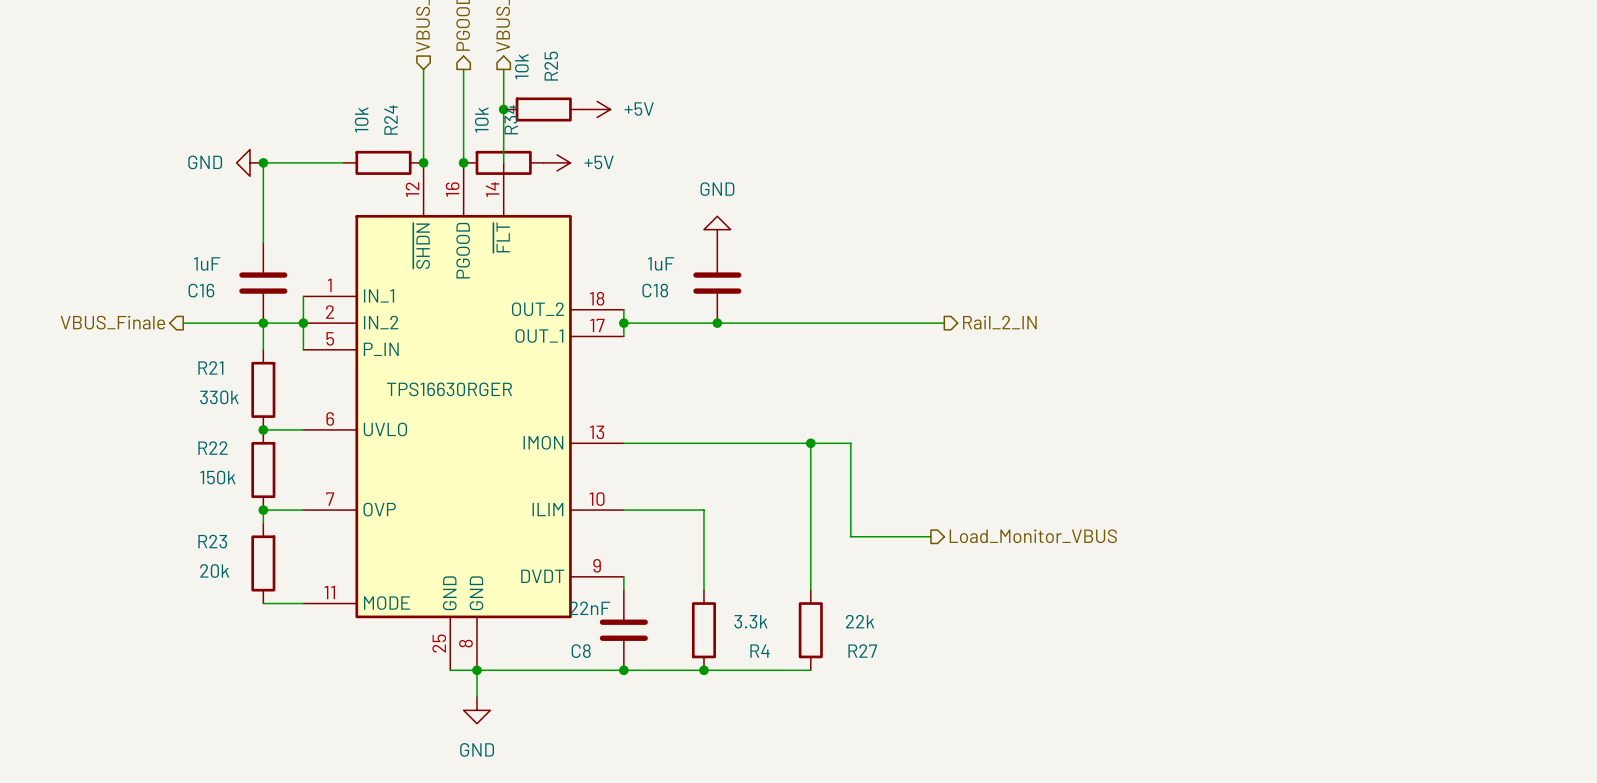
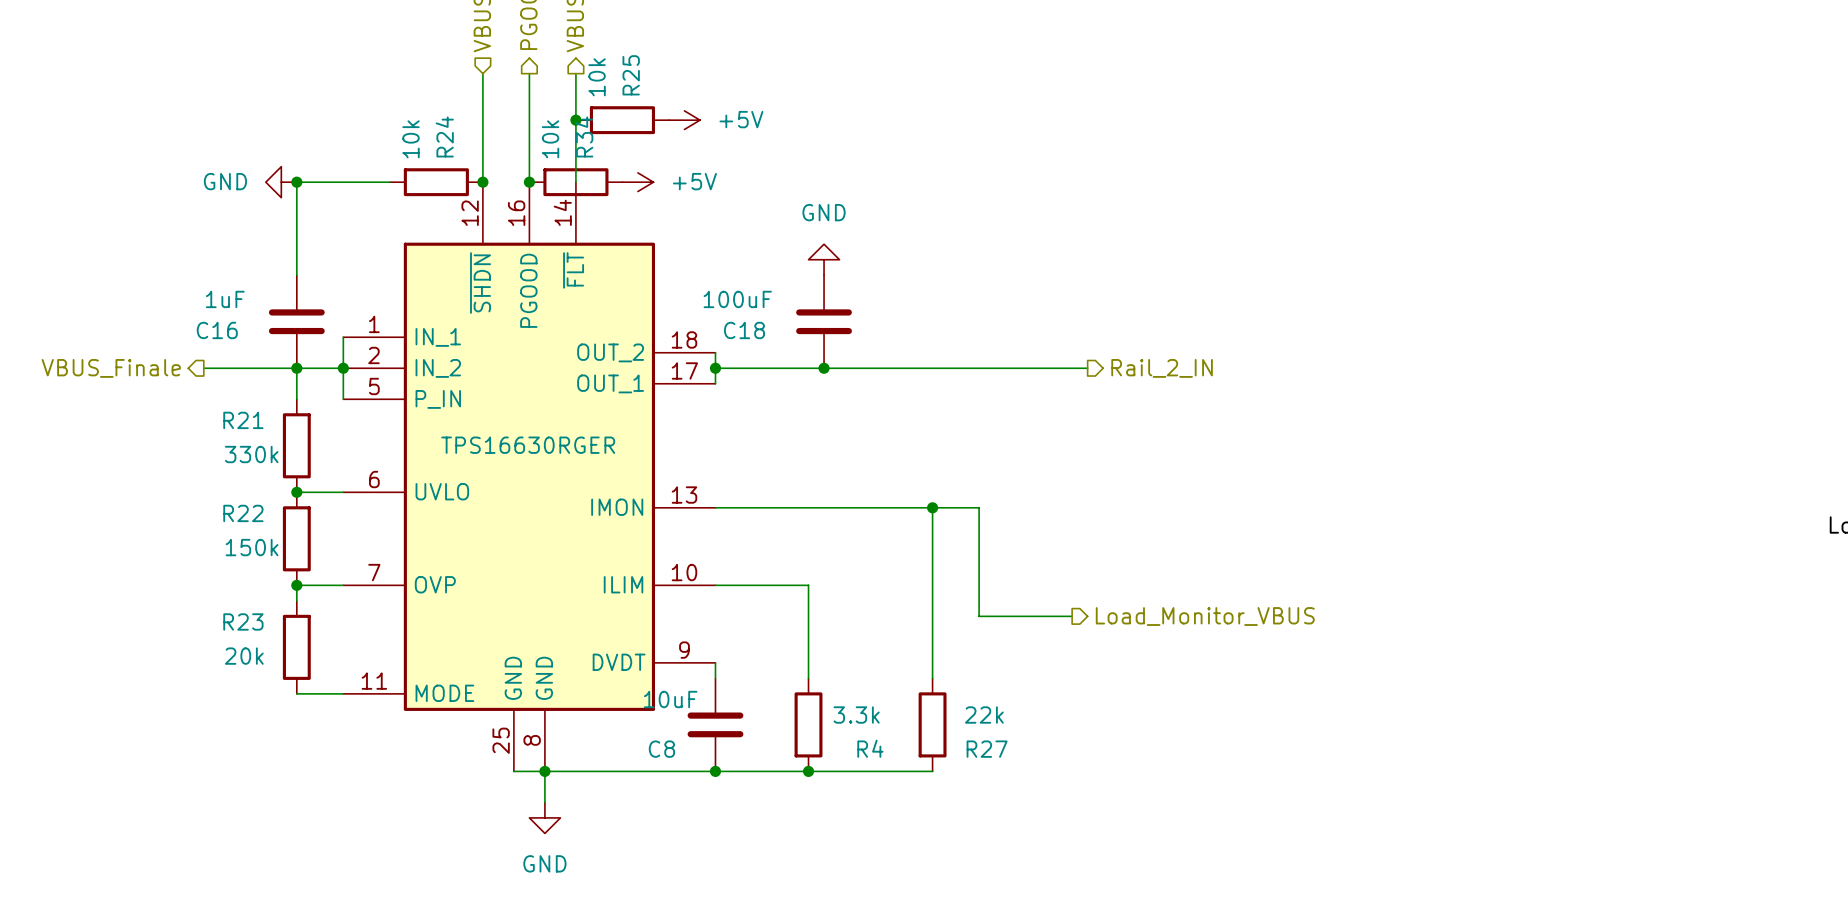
C18 value: 1uF (661, 263) -> 100uF (737, 299)
C8 value: 22nF (590, 608) -> 10uF (670, 699)

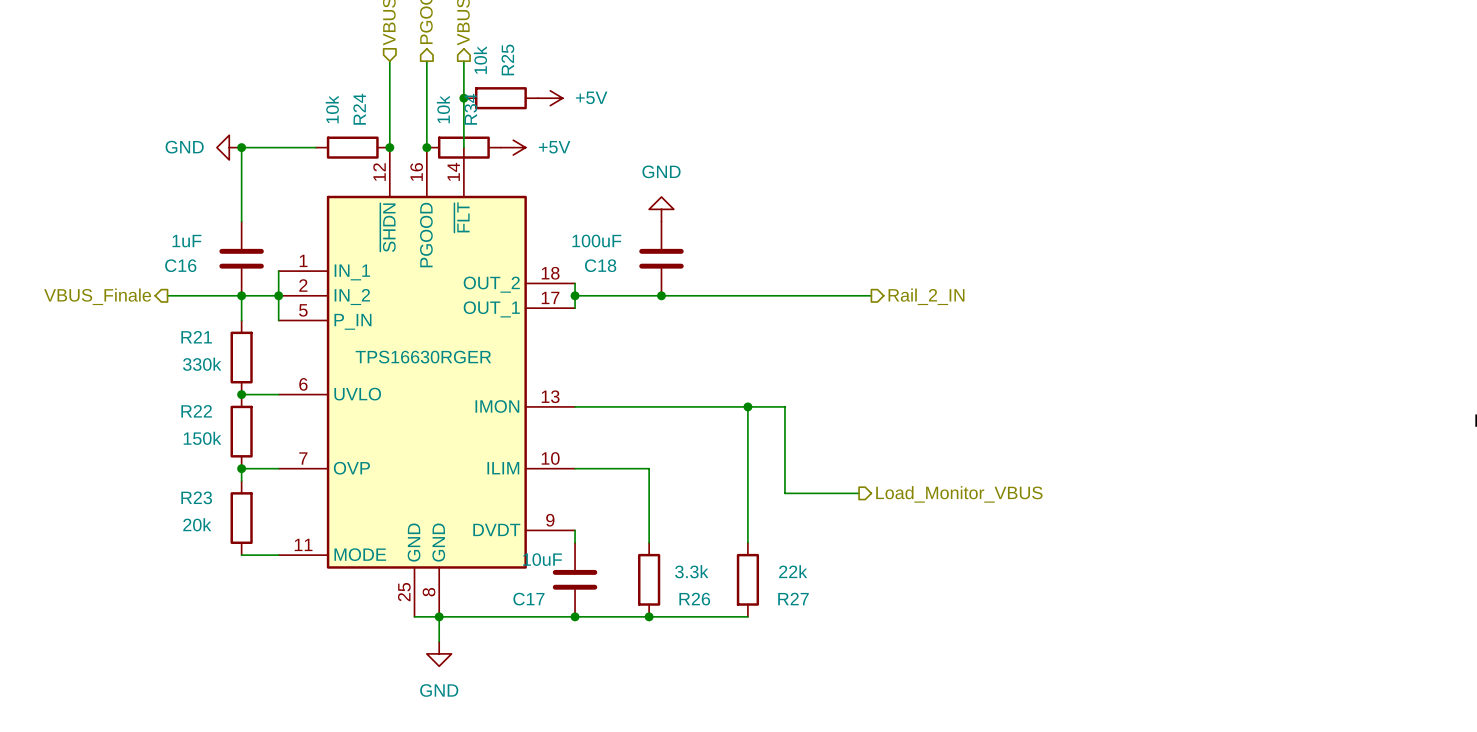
R4 name: R4 (870, 748) -> R26 (694, 599)
C8 name: C8 (661, 749) -> C17 (528, 599)

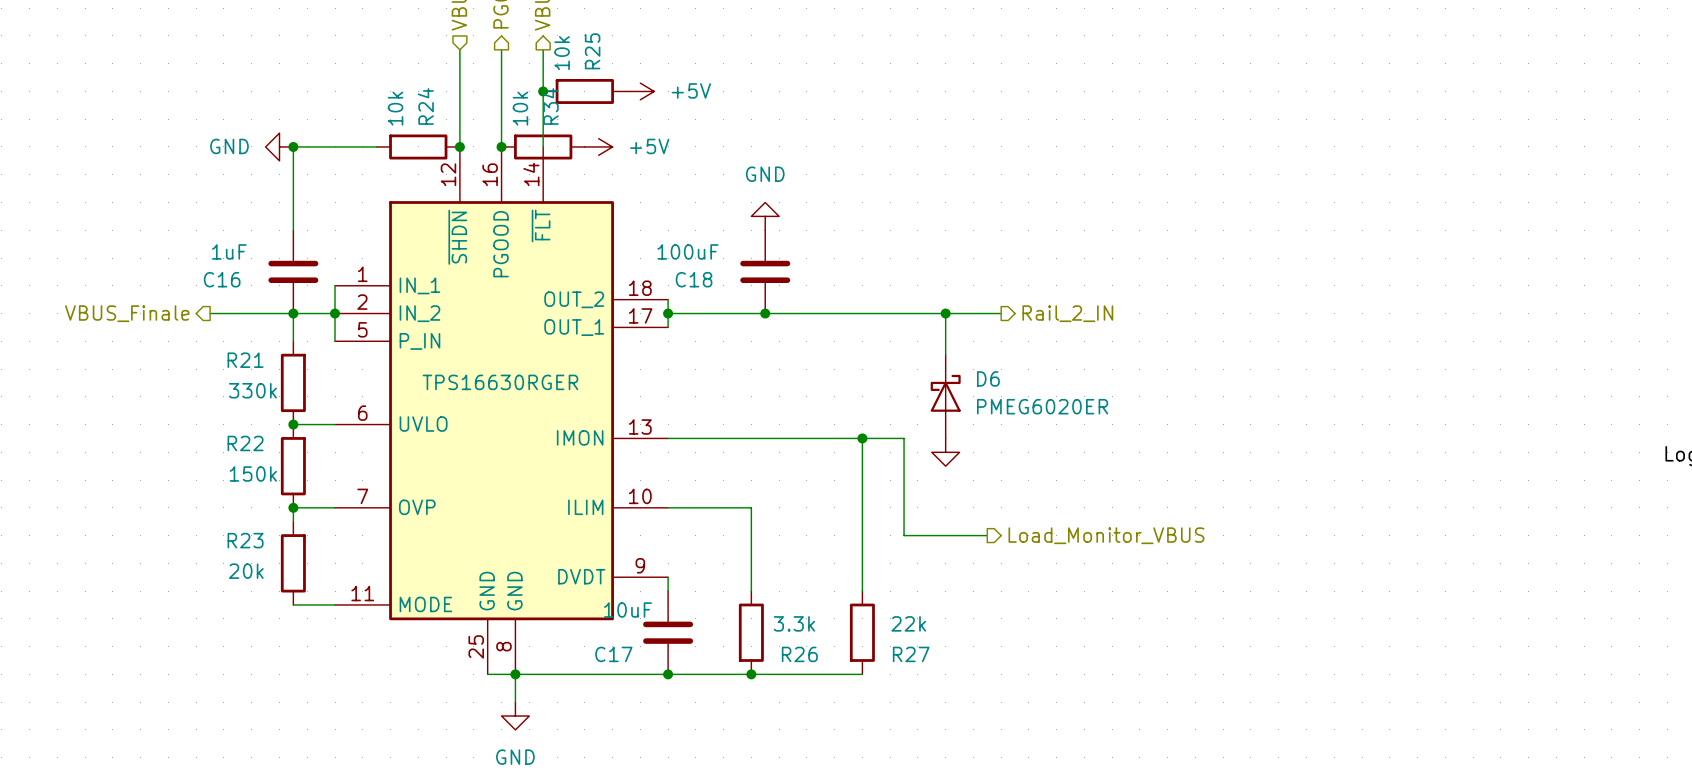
wire: none -> (945, 313) (945, 355)
junction: none -> (945, 313)
D6: none -> PMEG6020ER (945, 396)
power symbol: none -> (945, 452)

